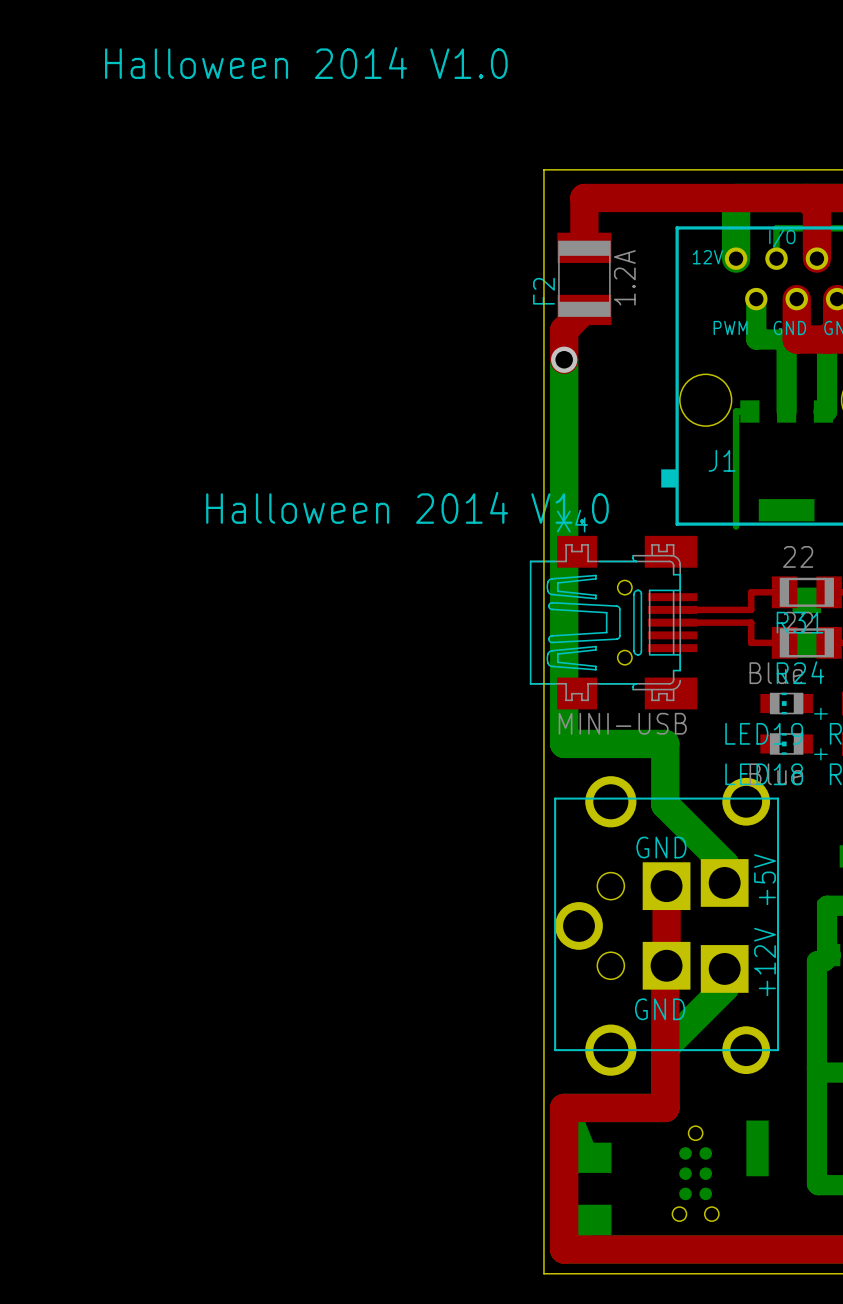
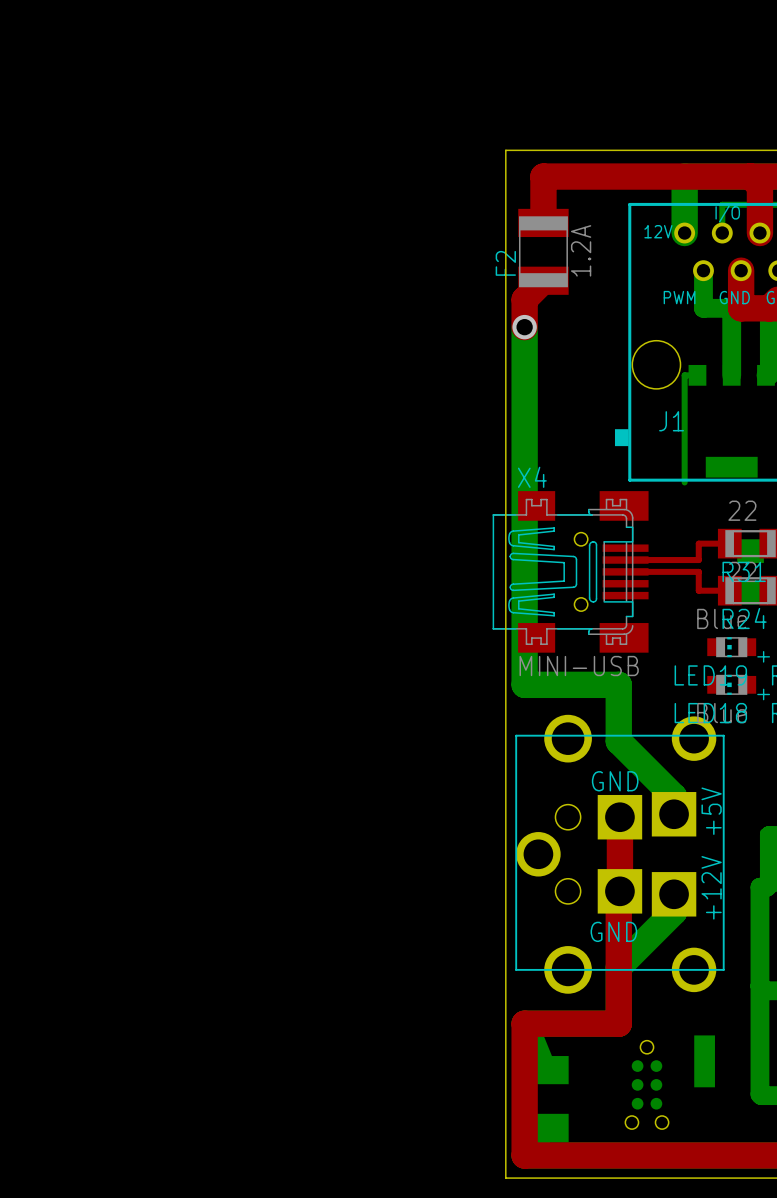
text: Halloween 2014 V1.0 (306, 63) -> none
text: Halloween 2014 V1.0 (407, 507) -> none

